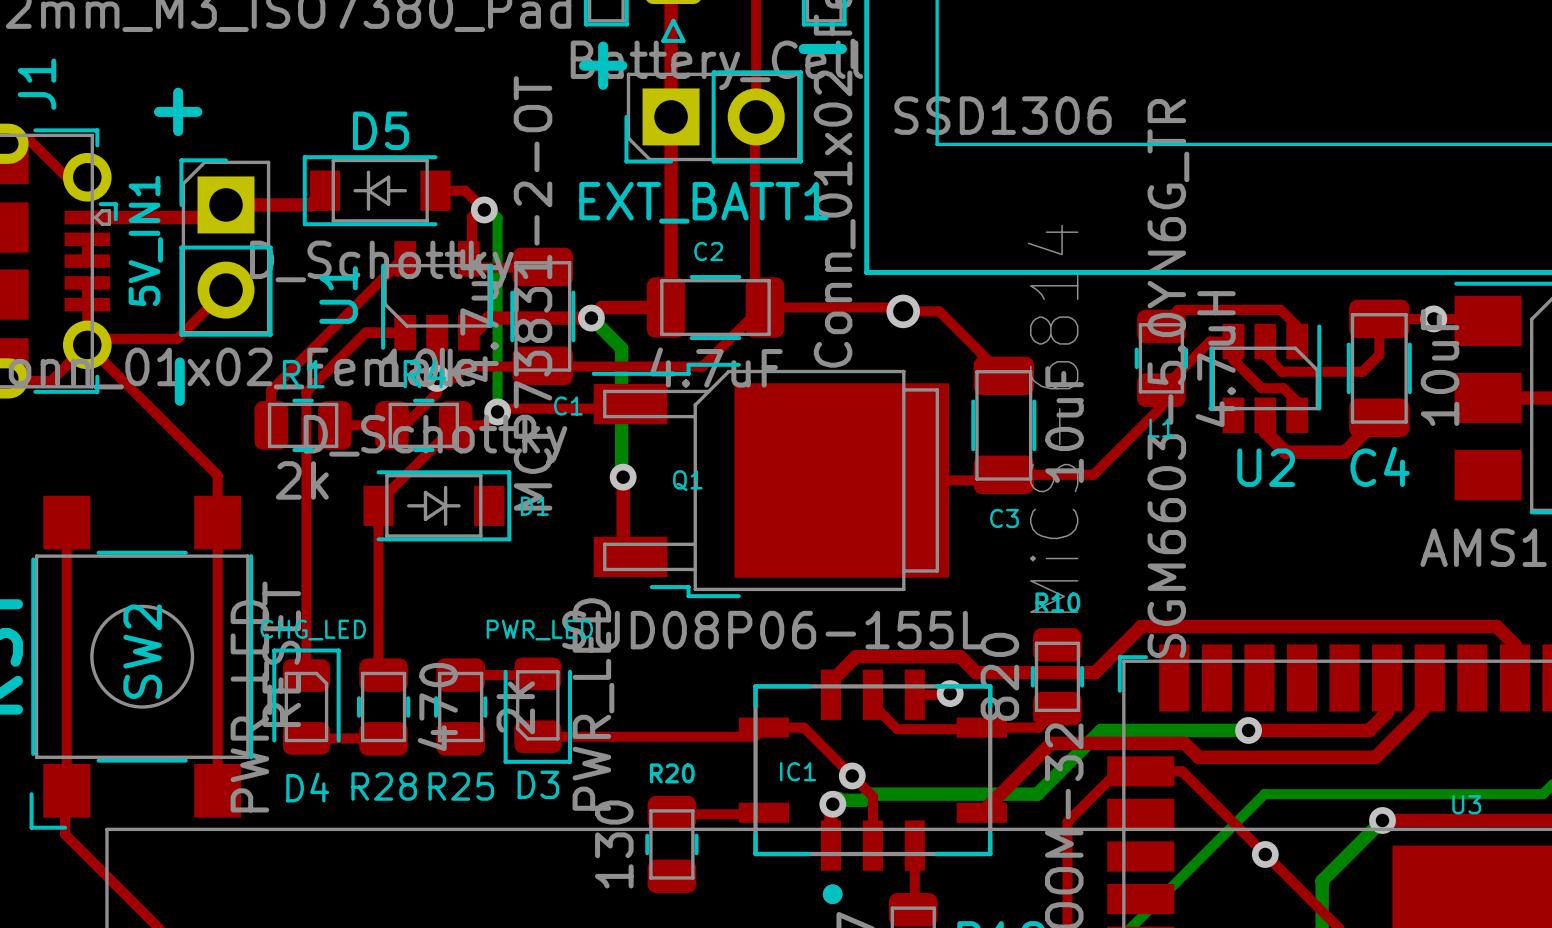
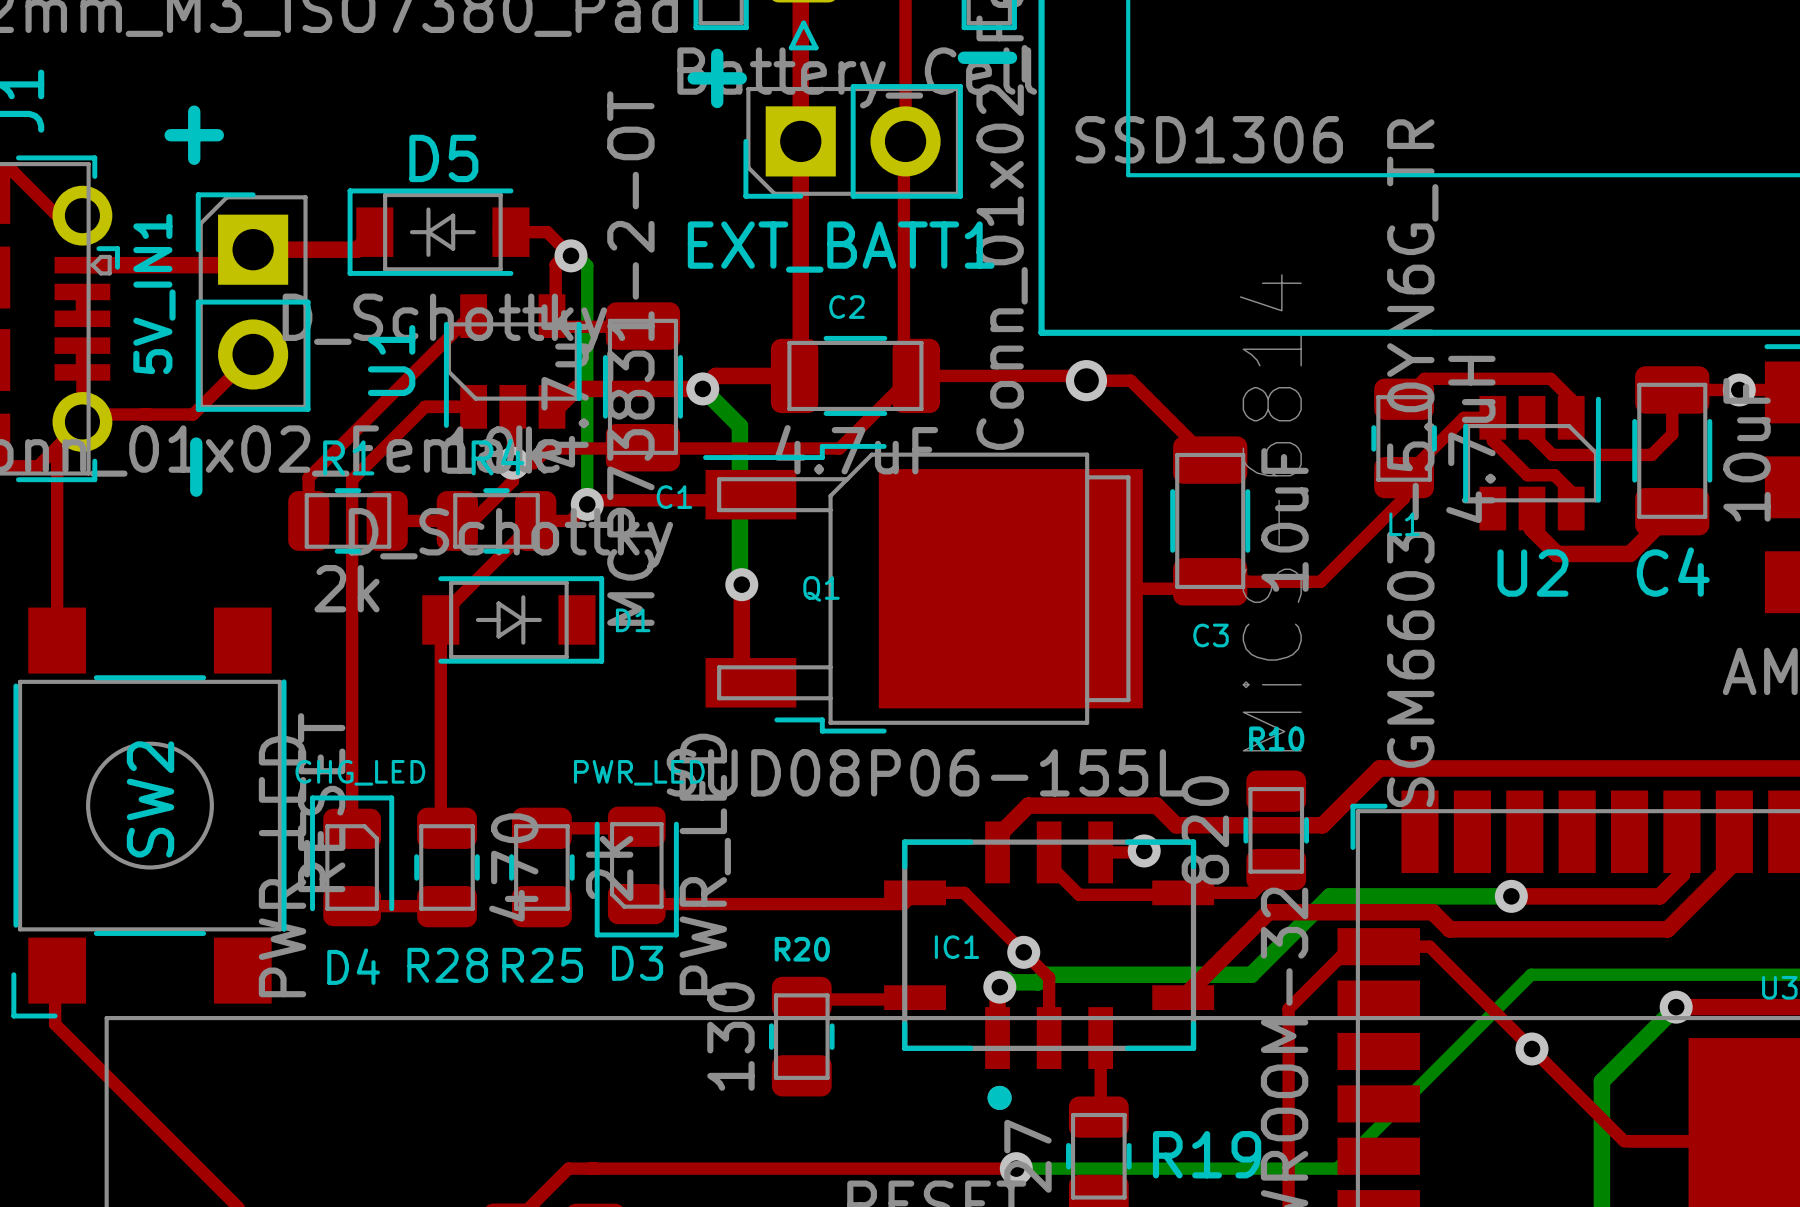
top track: (87, 344) (217, 475) (217, 790) -> none
top track: (66, 522) (66, 790) -> (57, 640) (57, 447)

